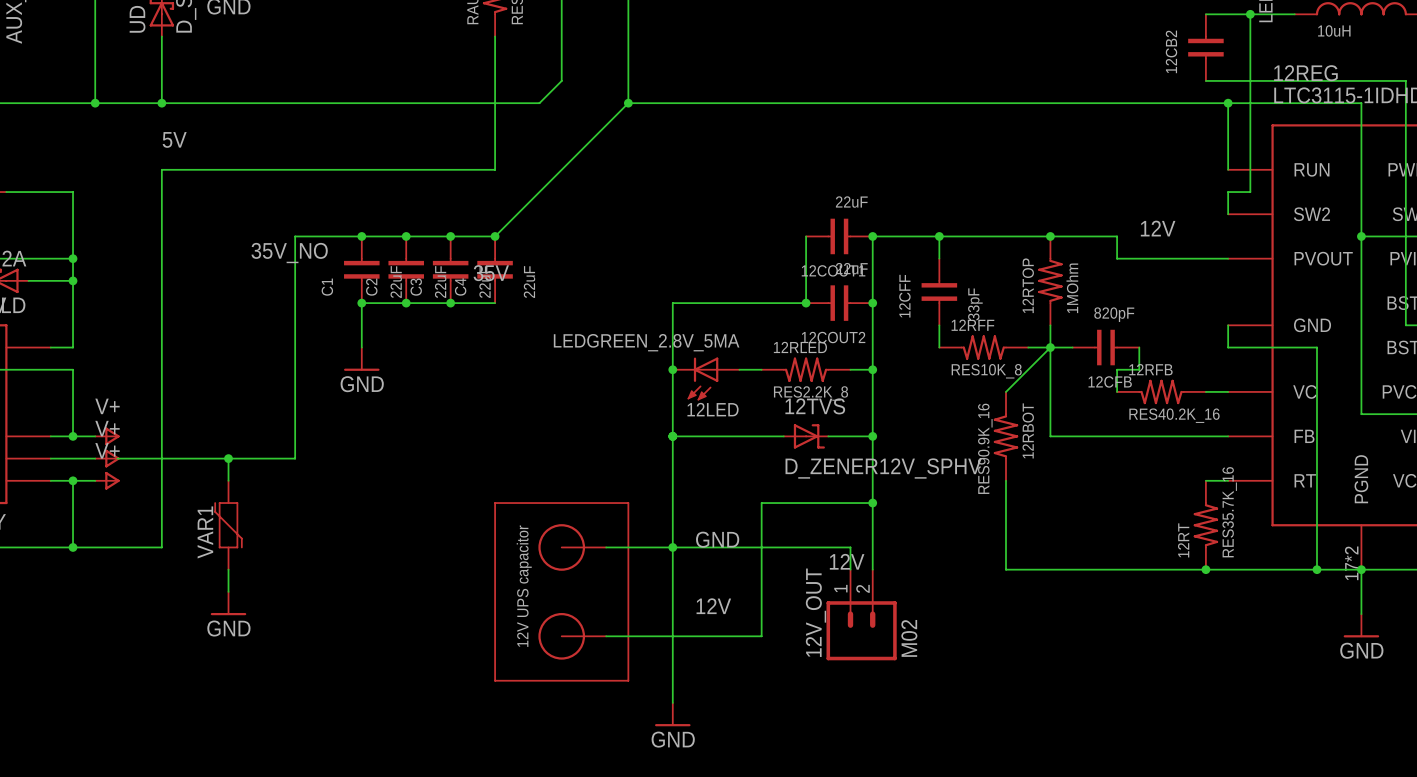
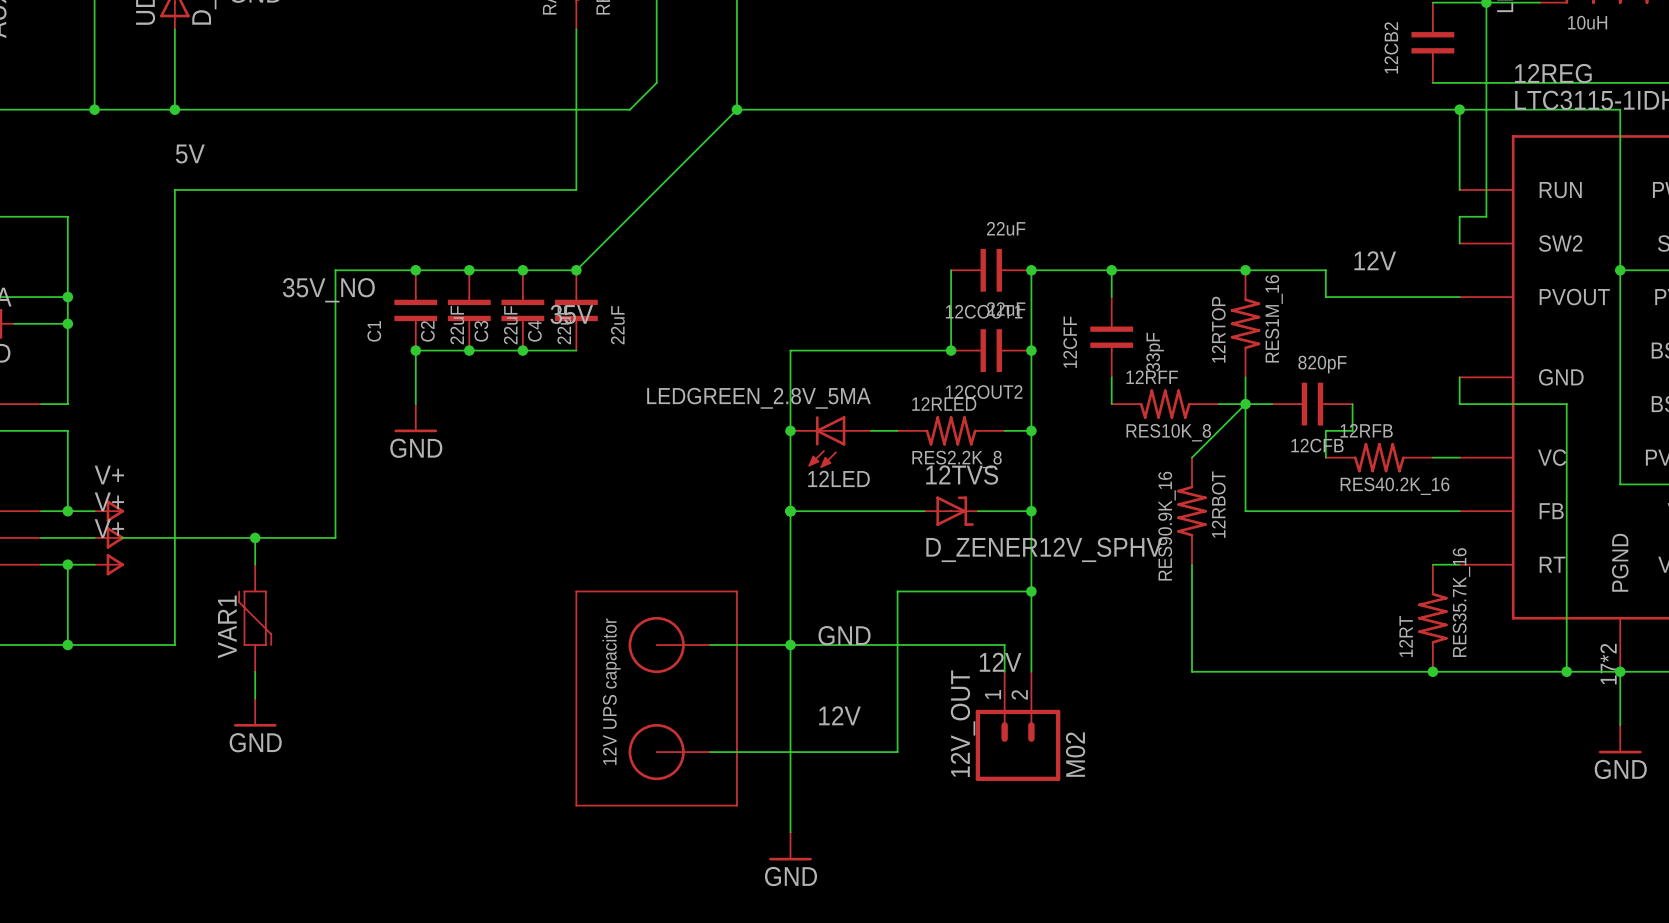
12RTOP value: 1MOhm (1072, 288) -> RES1M_16 (1274, 318)

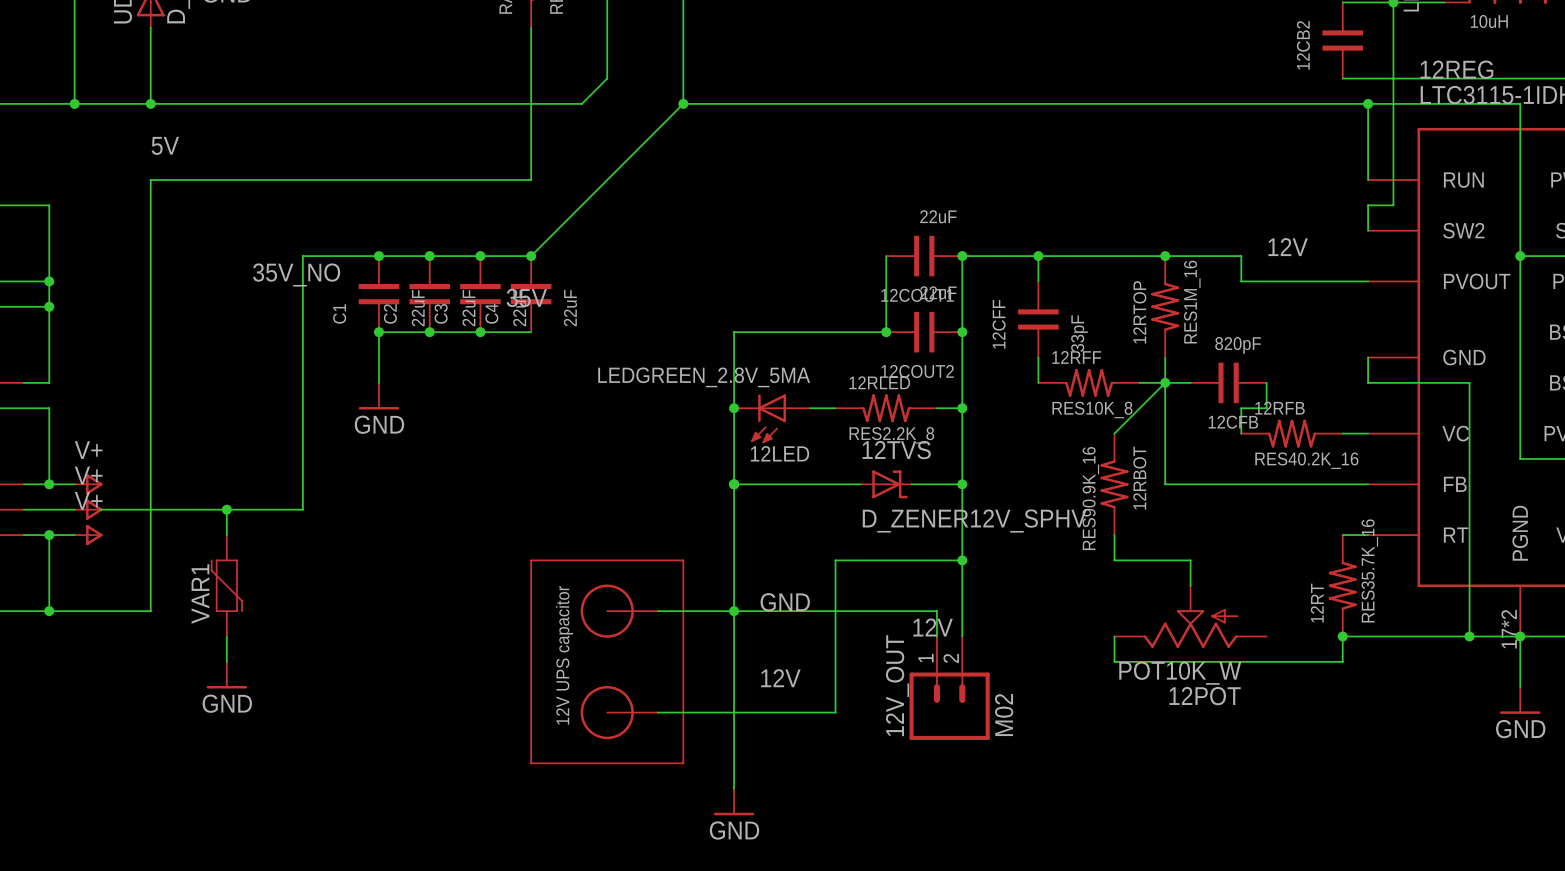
wire: (1191, 591) (1191, 671) (1432, 671) -> (1114, 636) (1114, 661) (1342, 661) (1342, 636)
wire: none -> (1114, 560) (1190, 560) (1190, 585)
12POT: none -> POT10K_W (1190, 616)

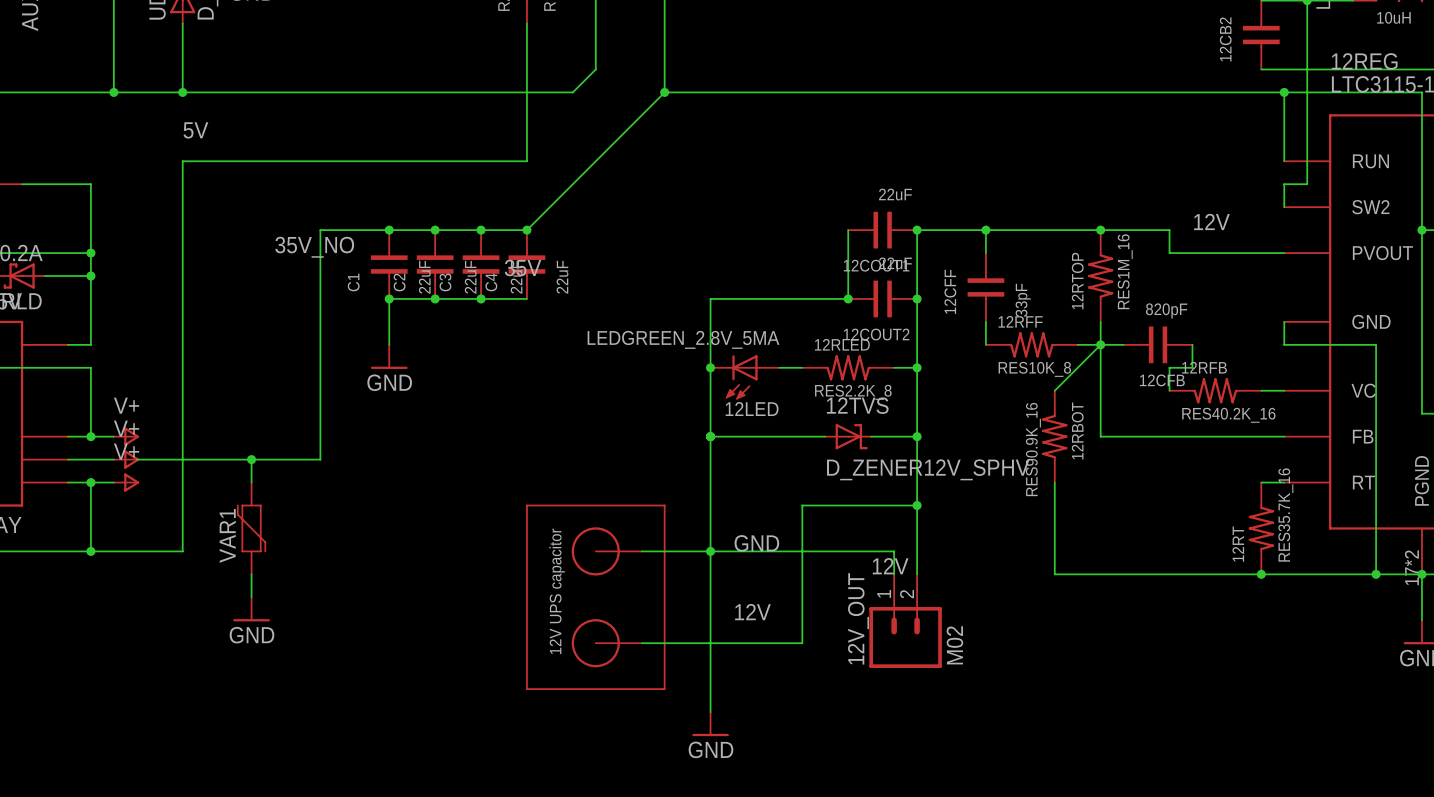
wire: (1114, 560) (1190, 560) (1190, 585) -> none
12POT: POT10K_W (1190, 616) -> none
wire: (1114, 636) (1114, 661) (1342, 661) (1342, 636) -> (1054, 505) (1054, 574) (1261, 574)

